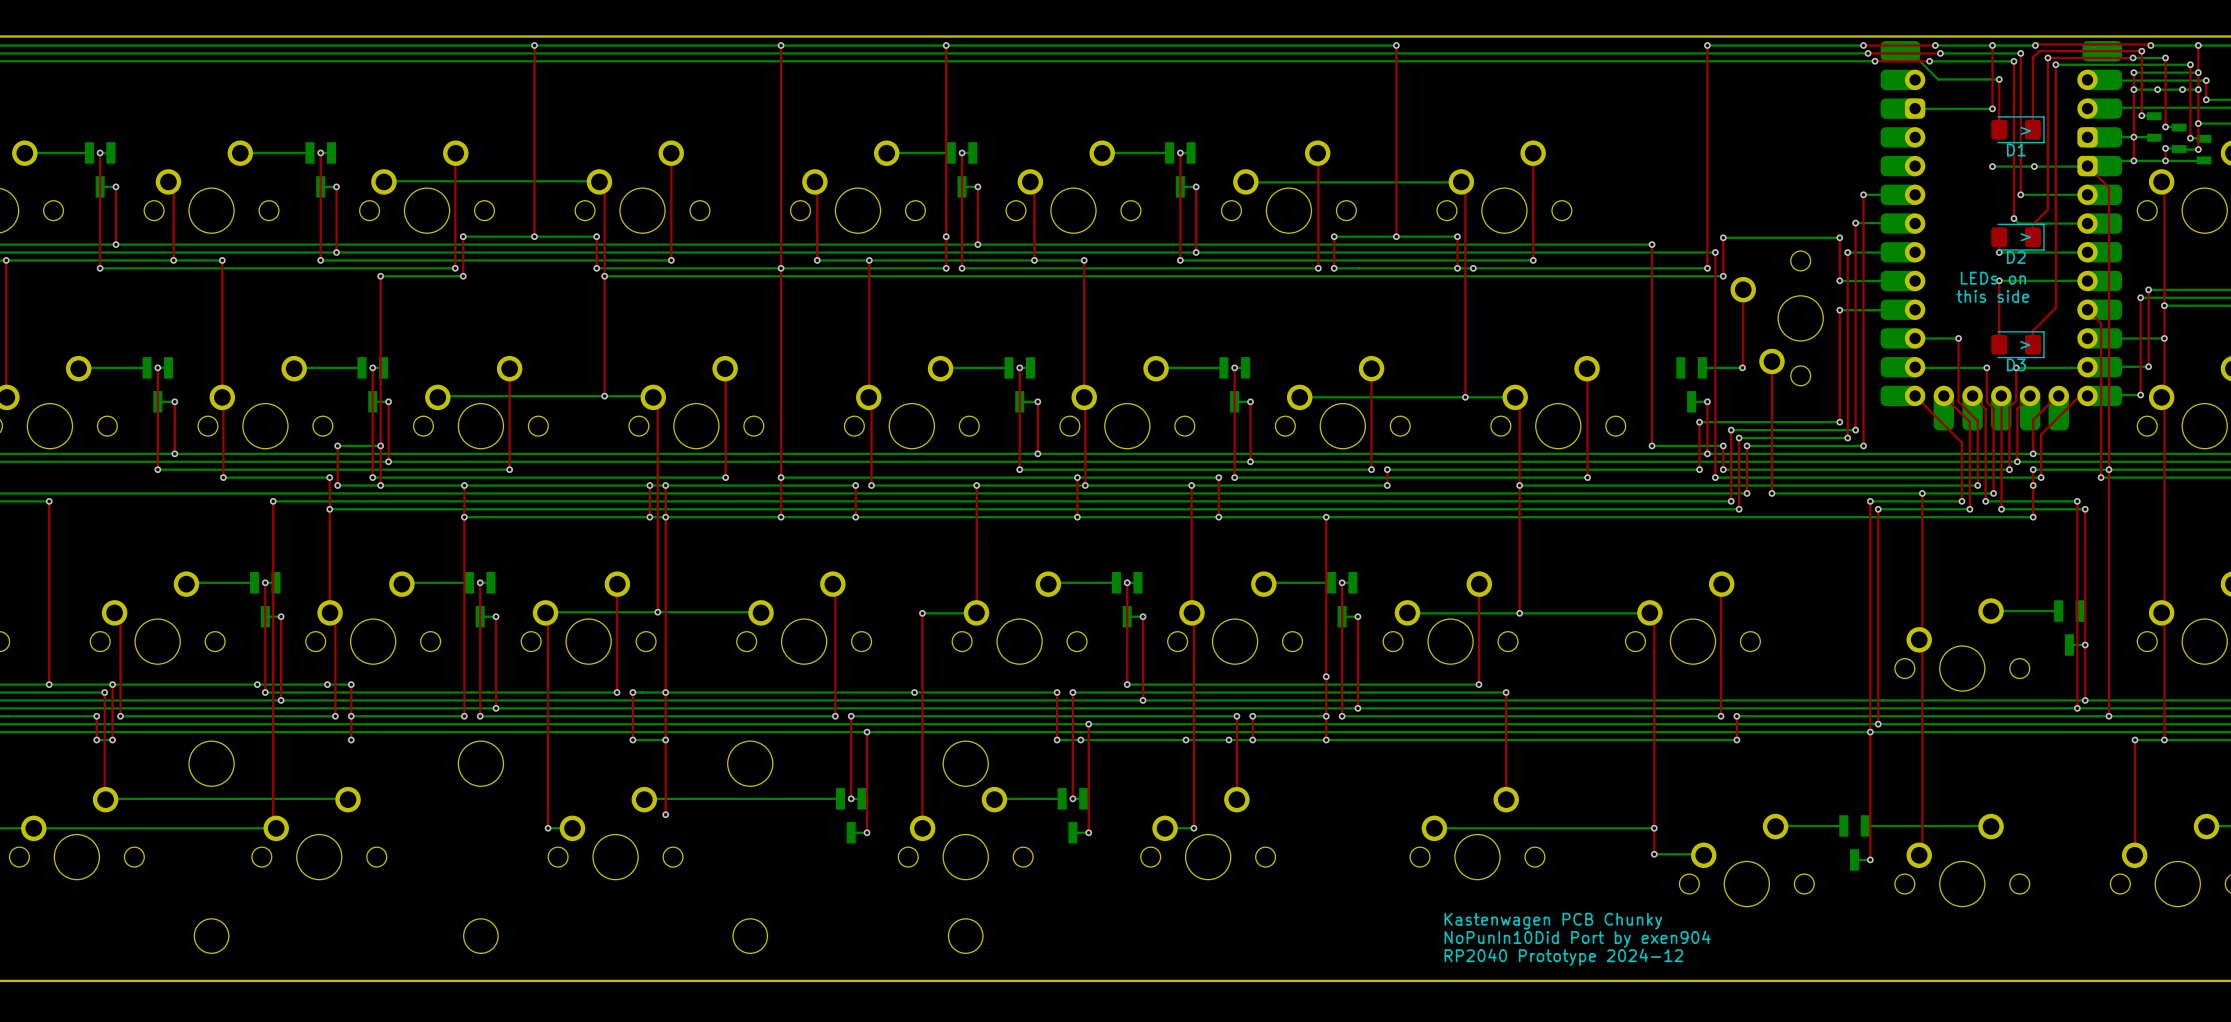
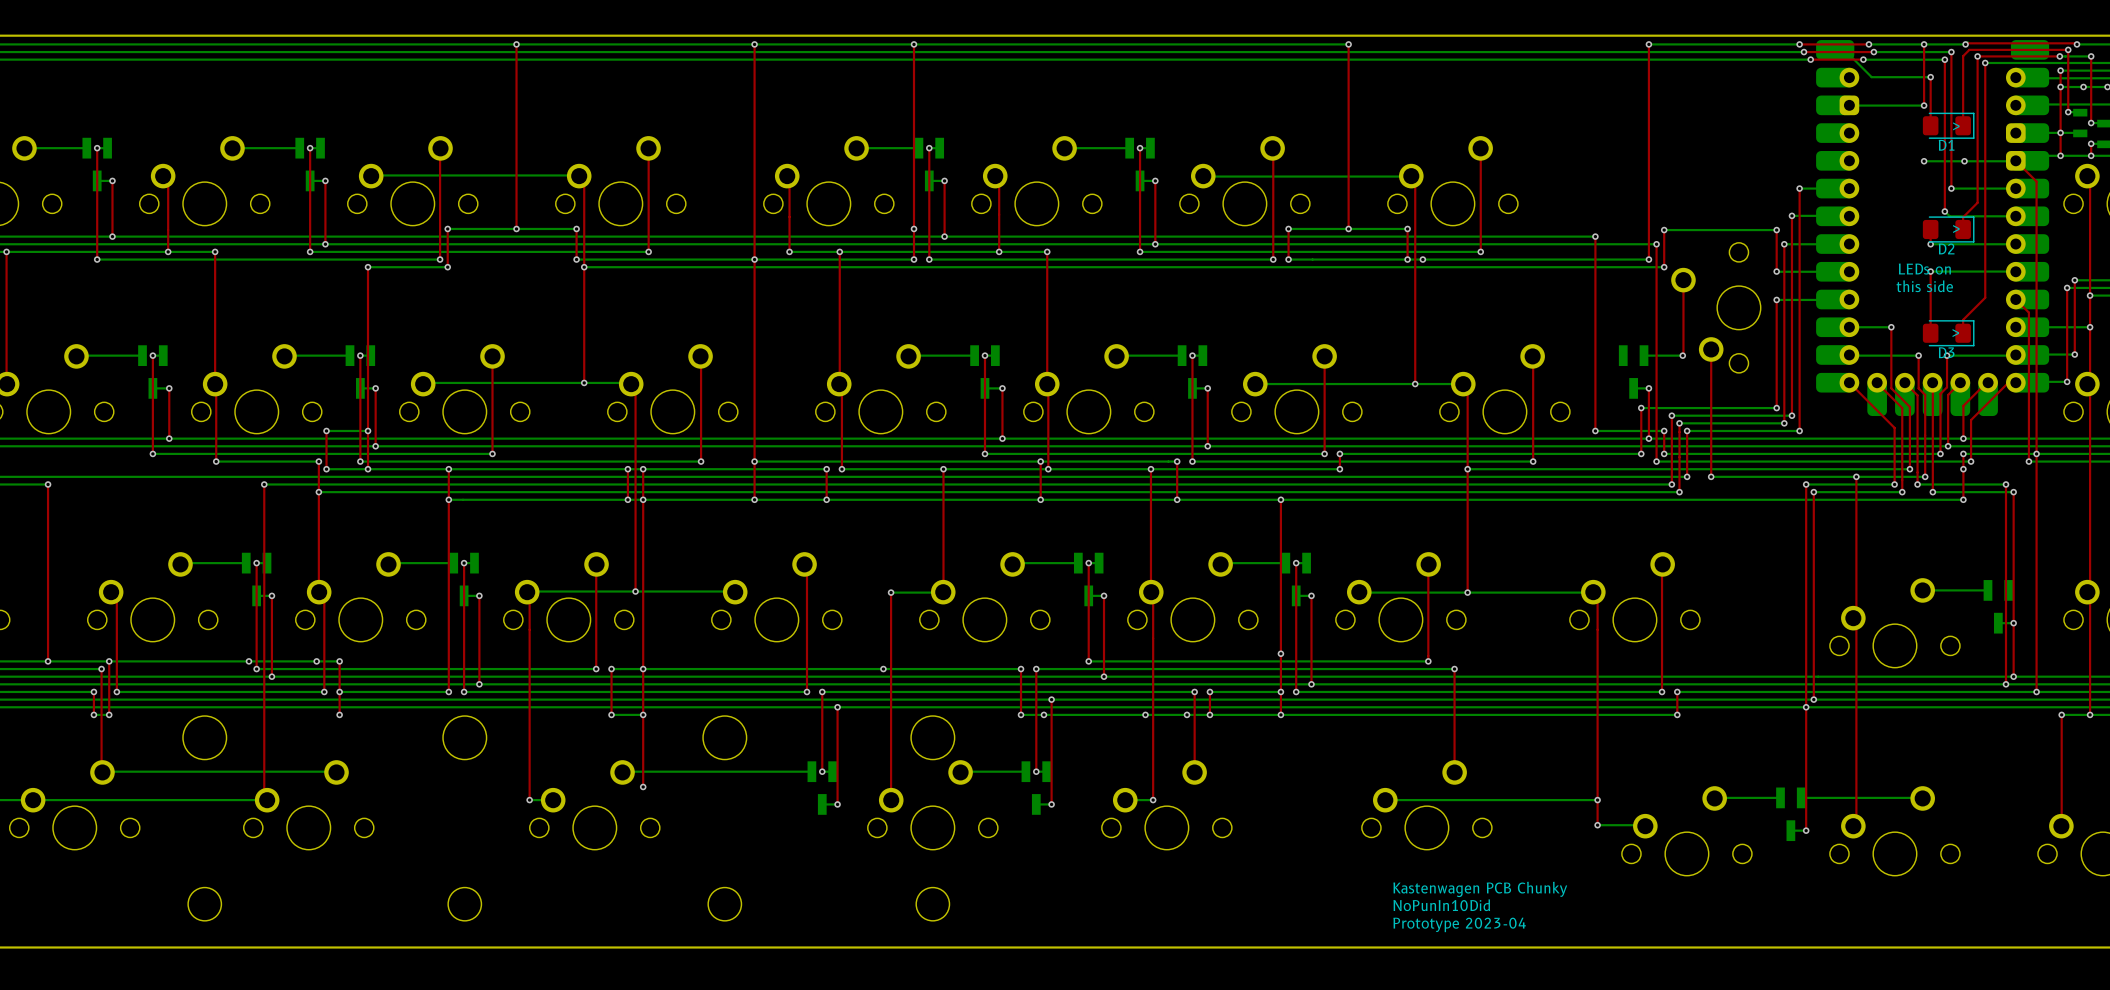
text: NoPunIn10Did Port by exen904 (1577, 939) -> NoPunIn10Did (1441, 905)
text: RP2040 Prototype 2024-12 (1563, 957) -> Prototype 2023-04 (1459, 924)

